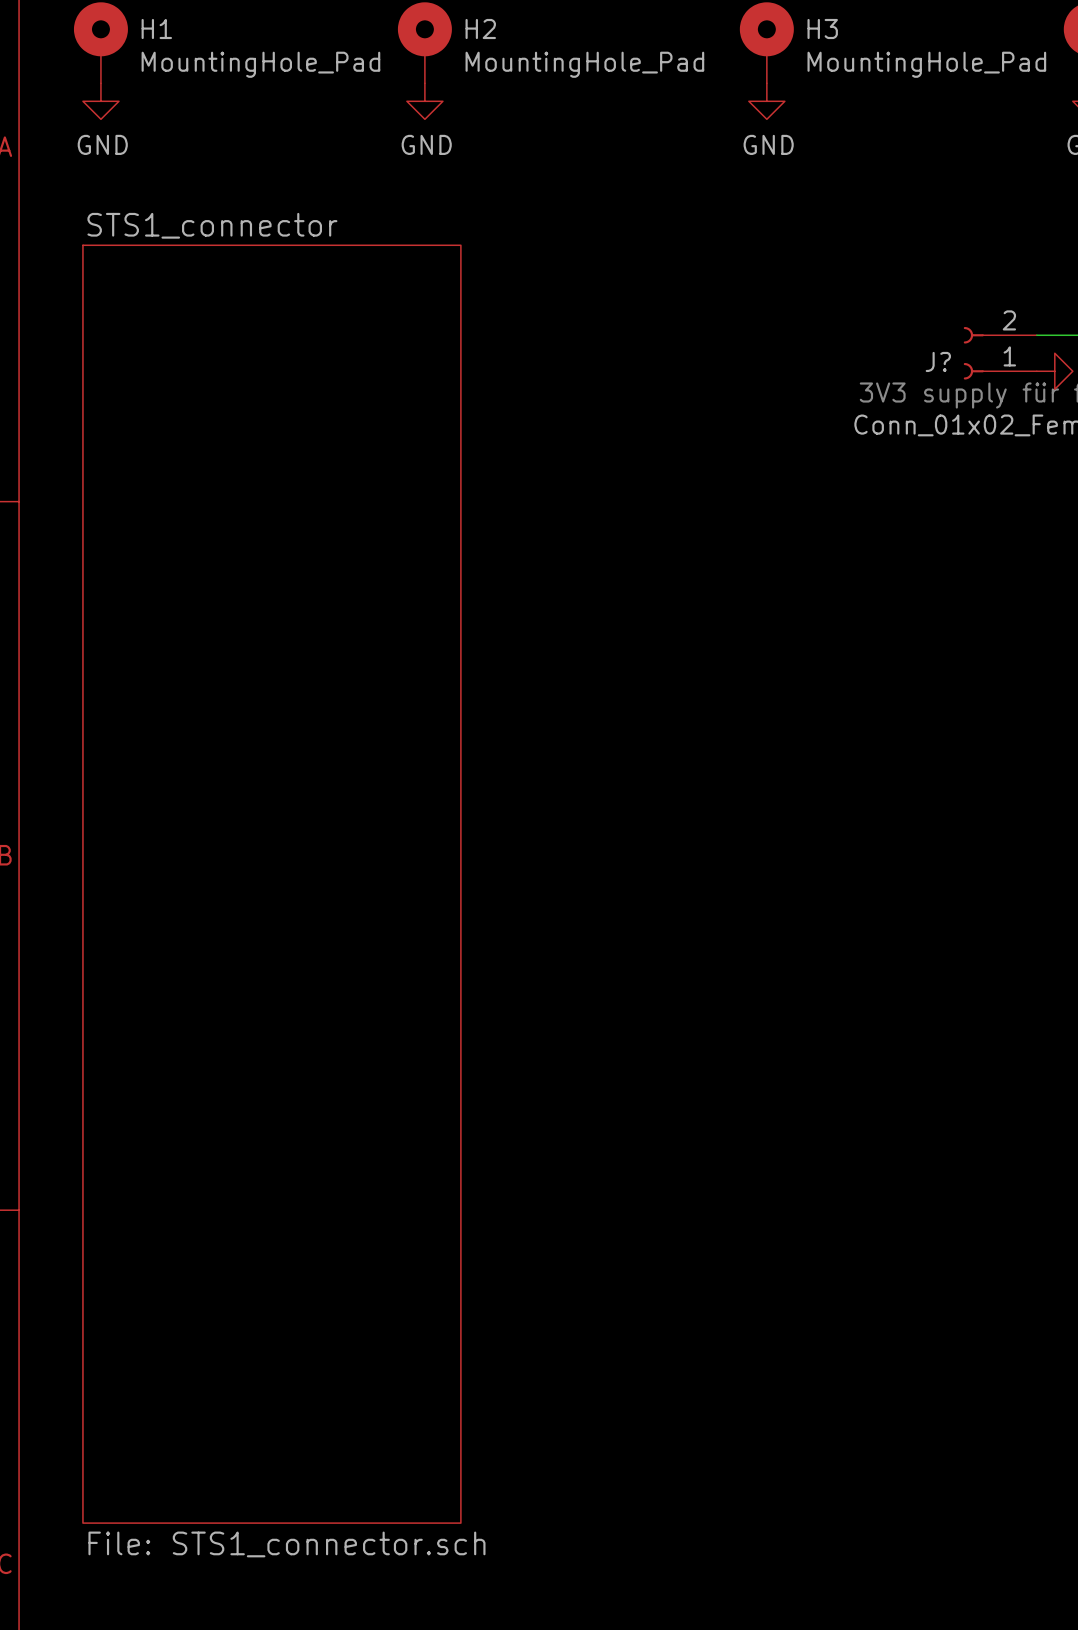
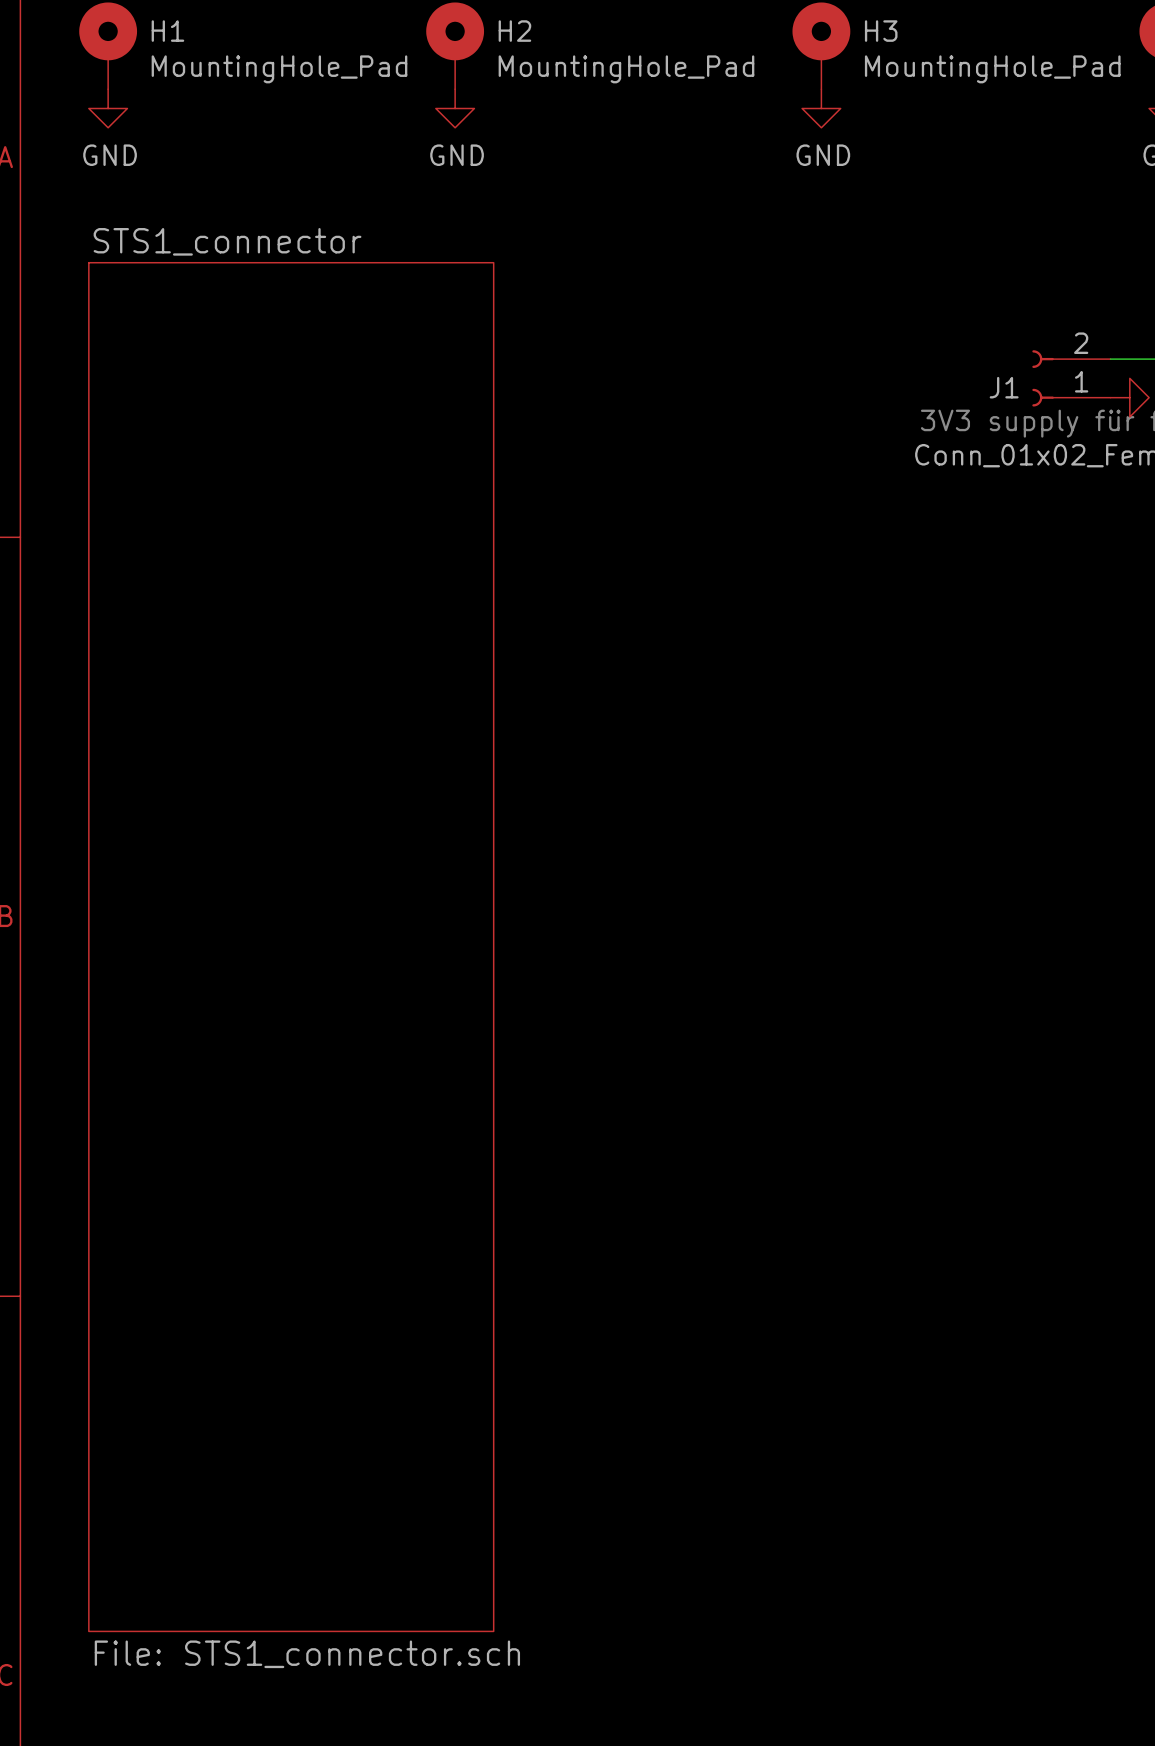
J? name: J? (938, 361) -> J1 (1004, 387)

